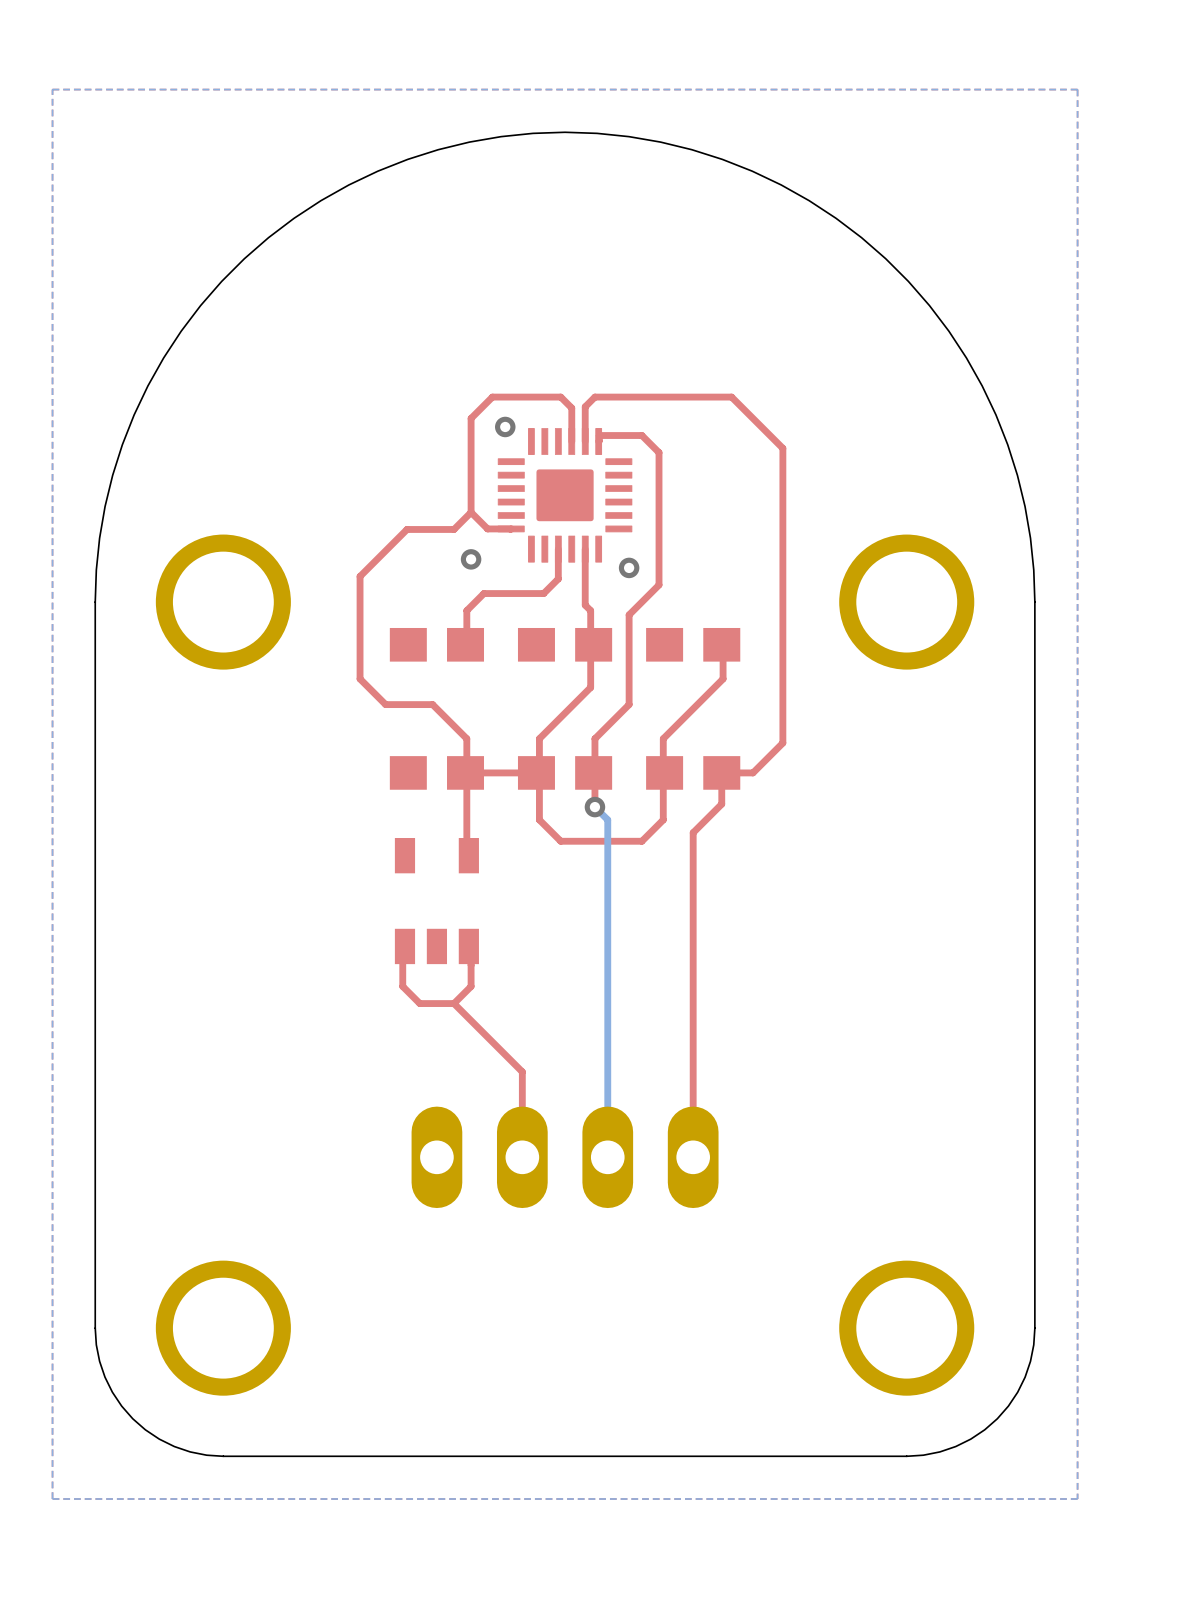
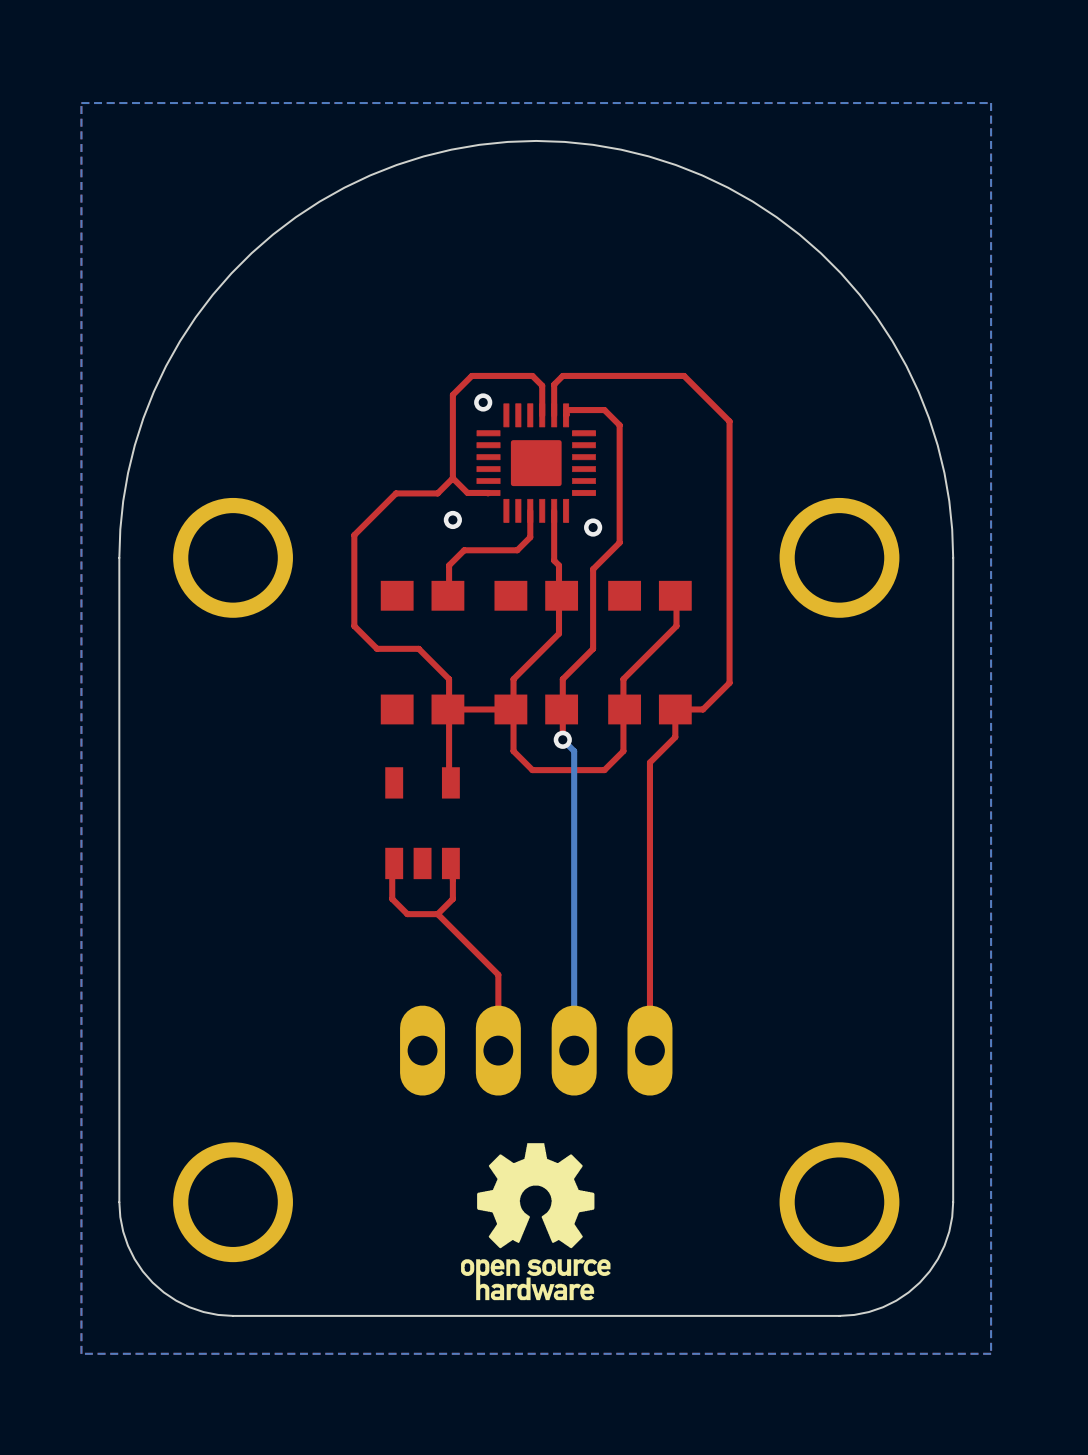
drawing: none -> [461, 1143, 611, 1301]

